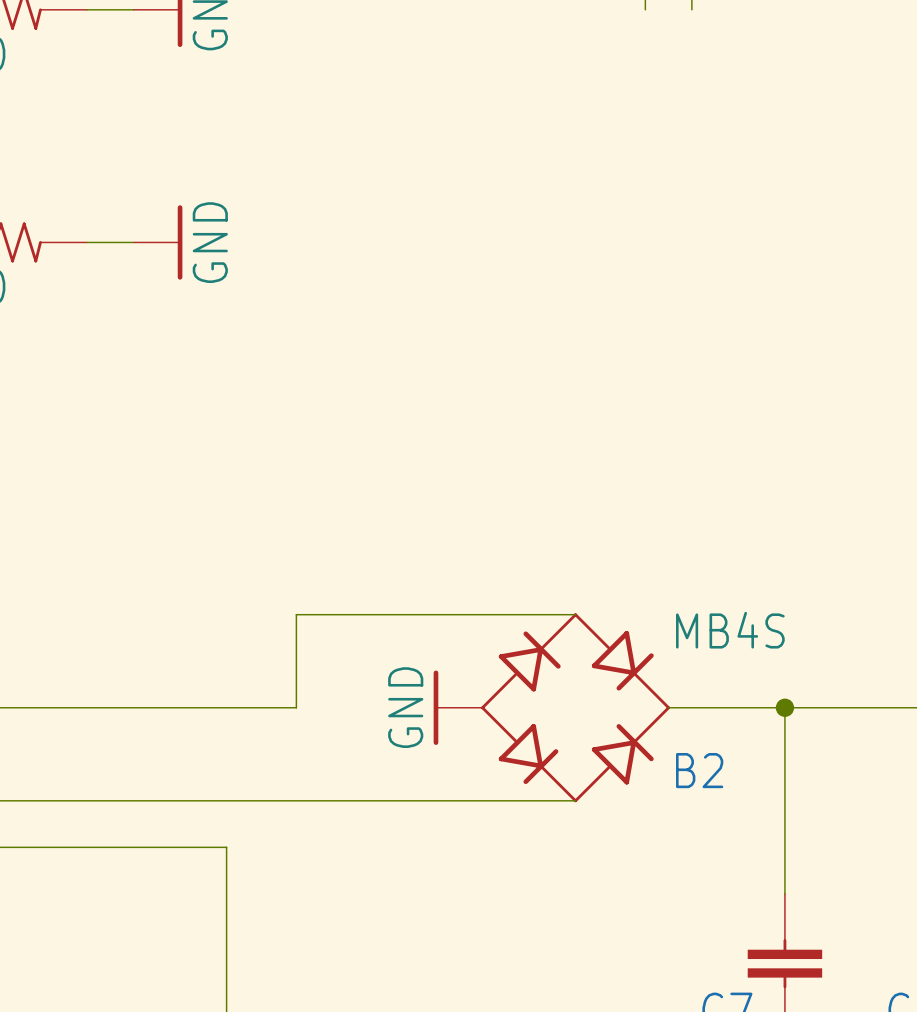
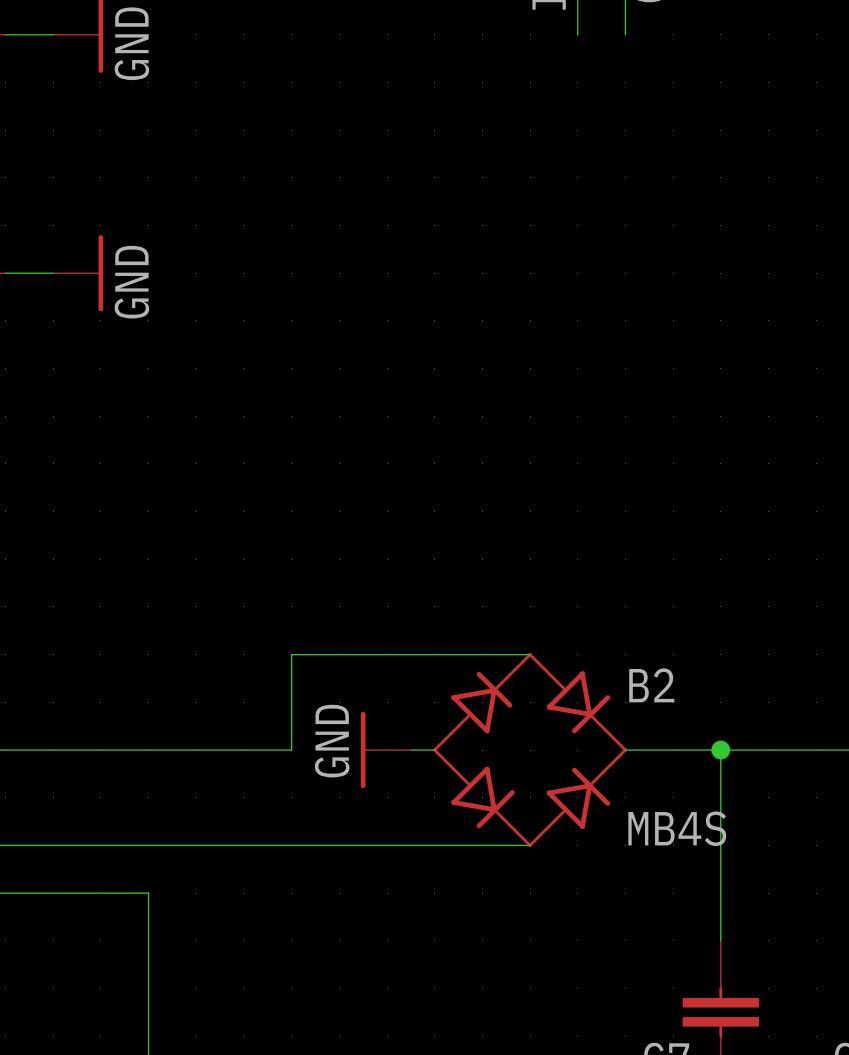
wire: (366, 614) (296, 614) (296, 707) -> (291, 654) (291, 750) (220, 750)
wire: none -> (410, 750) (434, 750)
B2 flip: as is (575, 707) -> up-down (530, 750)
wire: (668, 707) (691, 707) -> (506, 654) (530, 654)
wire: none -> (506, 845) (530, 845)

